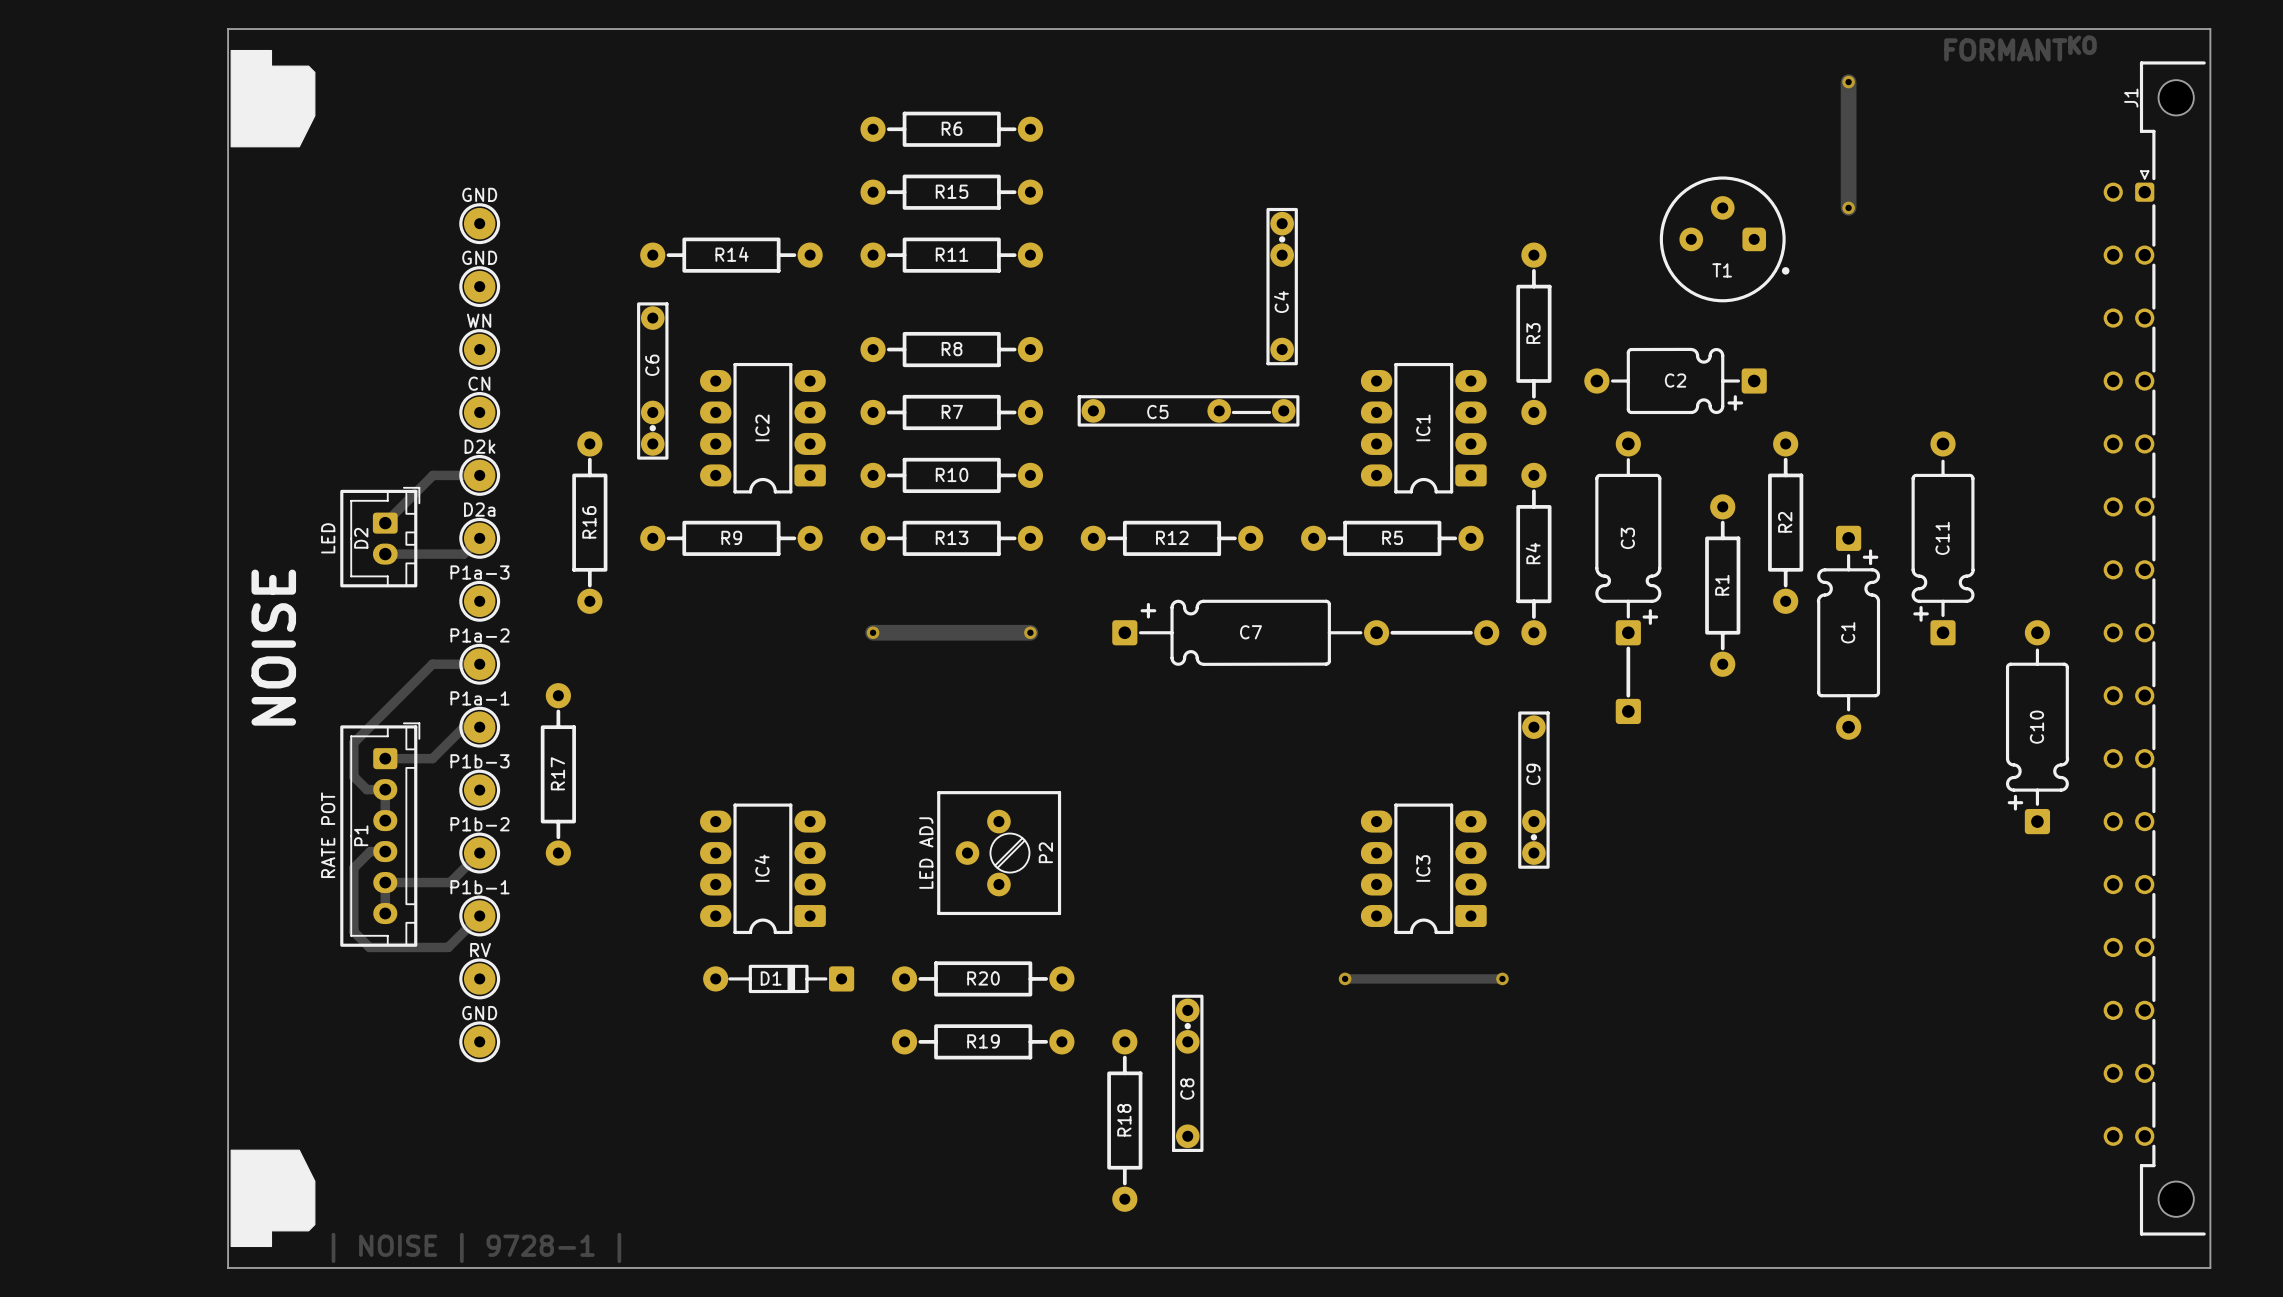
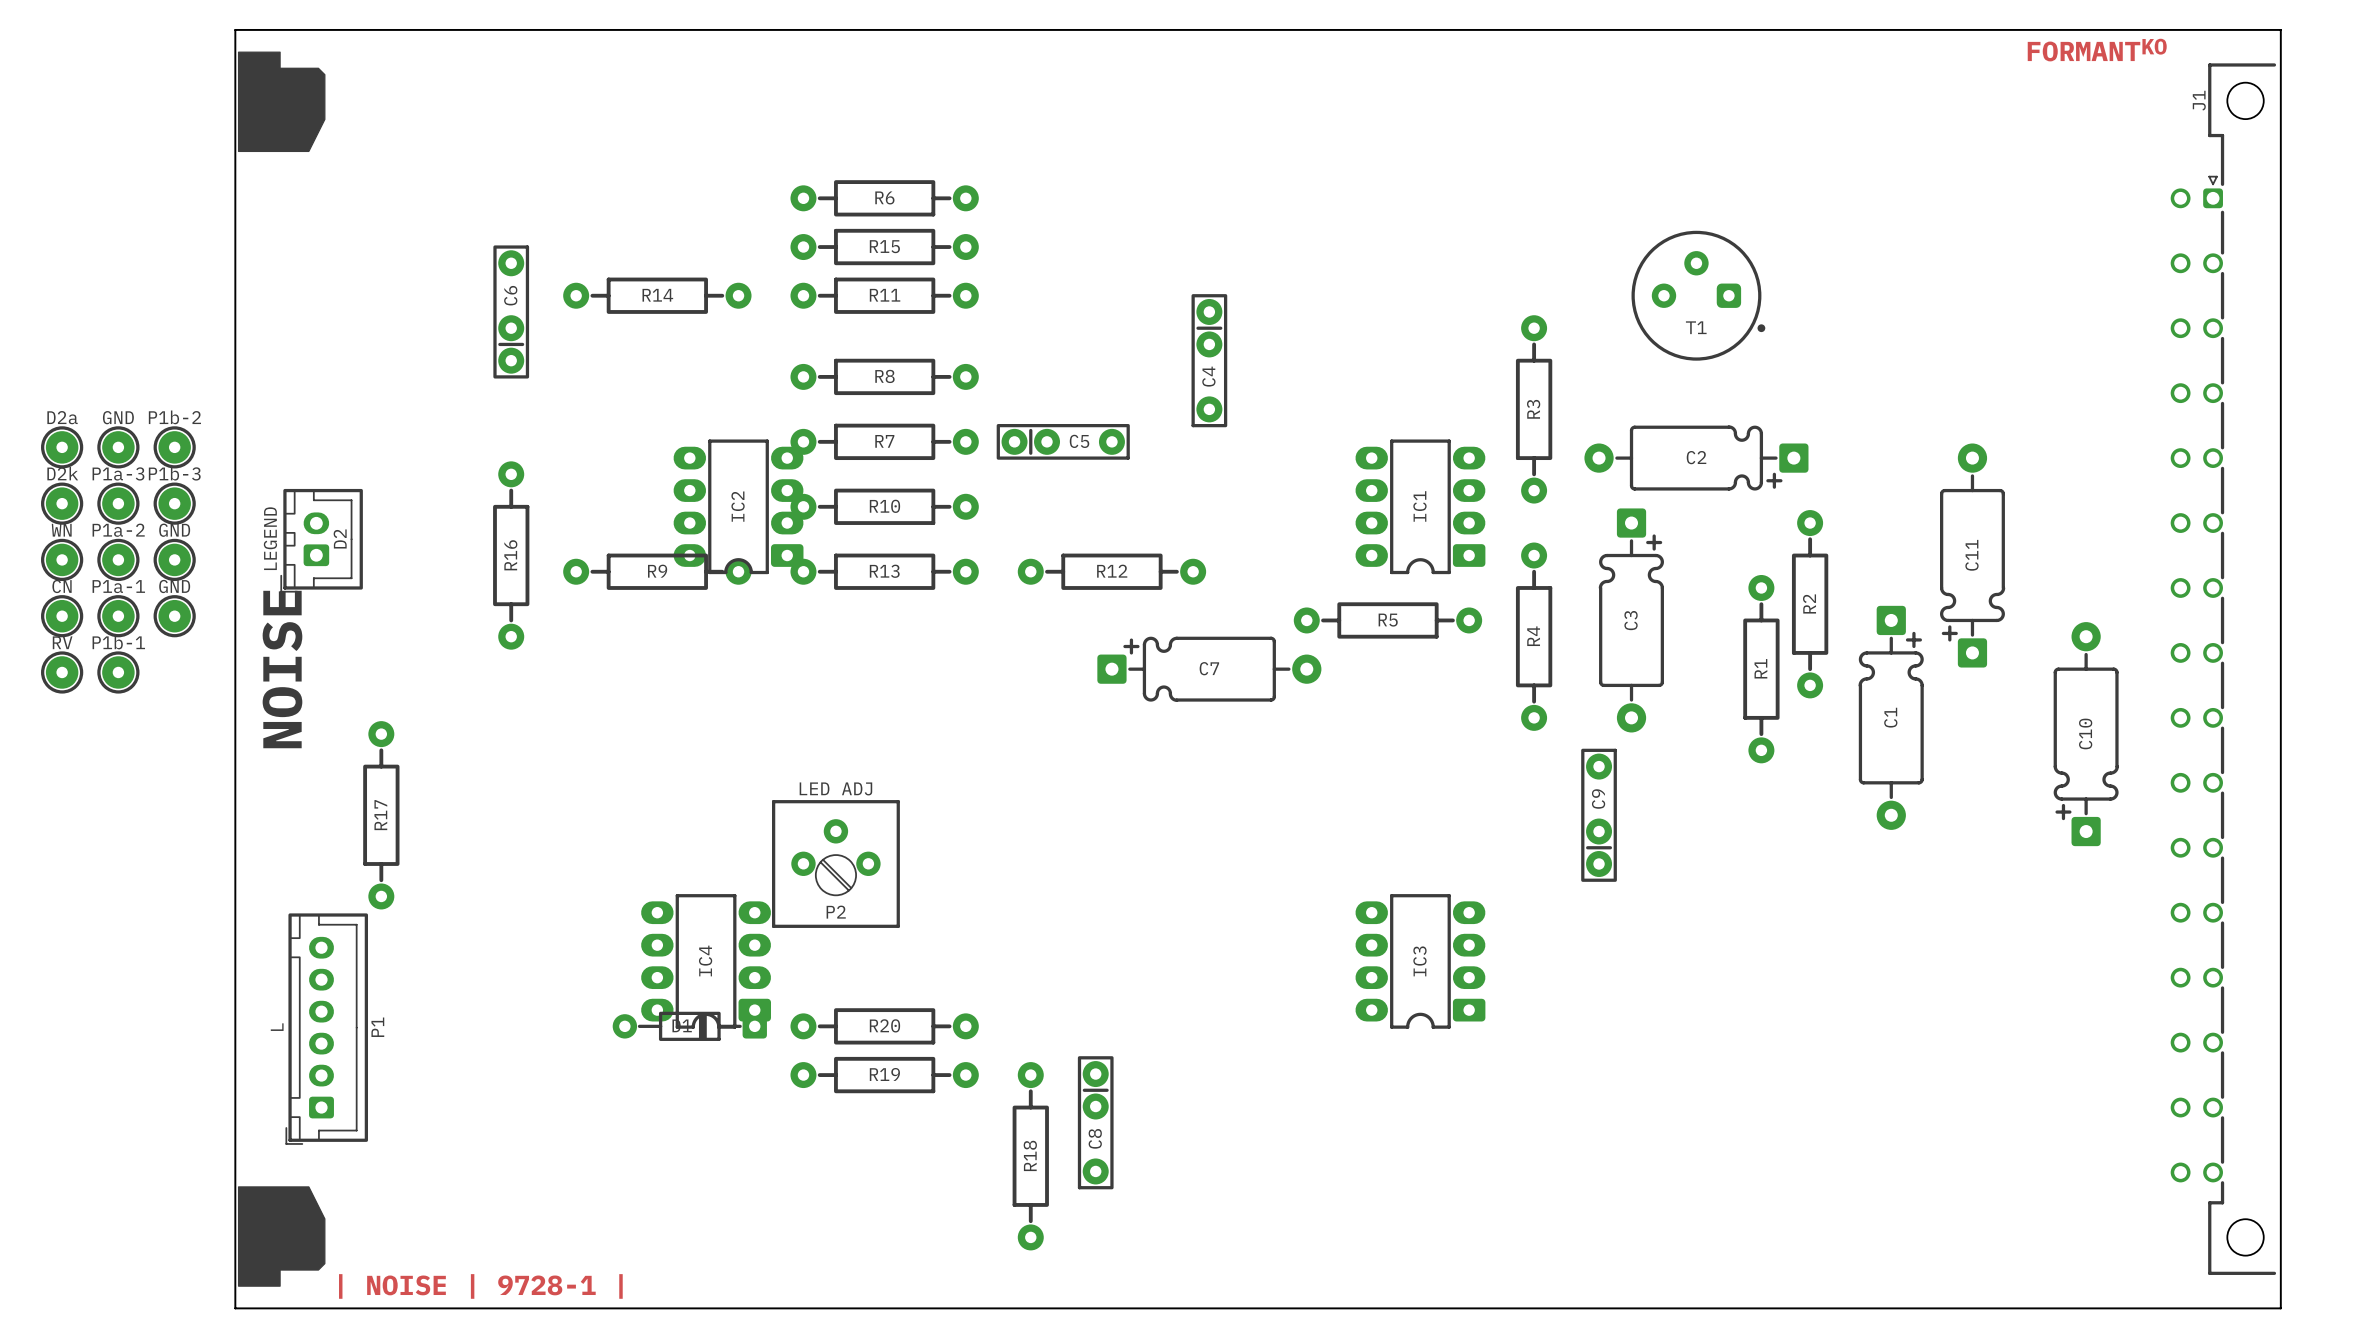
track: (1848, 82) (1848, 207) -> none
via: (1848, 82) -> none
R6 position: (951, 129) -> (884, 198)
R15 position: (951, 192) -> (884, 247)
C4 footprint: [1266, 207, 1298, 366] -> [1191, 294, 1228, 428]
via: (1848, 207) -> none
part: GND (479, 223) -> none
T1 position: (1724, 239) -> (1698, 295)
R14 position: (731, 255) -> (657, 295)
R11 position: (951, 255) -> (884, 295)
part: GND (479, 286) -> none
C6 footprint: [637, 302, 669, 460] -> [493, 245, 530, 379]
R3 position: (1533, 333) -> (1534, 409)
C2 footprint: [1584, 347, 1767, 415] -> [1584, 425, 1809, 491]
part: WN (479, 349) -> none
R8 position: (951, 349) -> (884, 376)
C5 footprint: [1077, 395, 1300, 427] -> [996, 424, 1130, 460]
part: CN (479, 412) -> none
R7 position: (951, 412) -> (884, 441)
C5 name position: C5 (1157, 412) -> C5 (1079, 441)
IC2 position: (762, 428) -> (738, 506)
IC1 position: (1423, 428) -> (1420, 506)
C3 footprint: [1595, 431, 1662, 725] -> [1598, 508, 1664, 733]
C11 footprint: [1911, 431, 1975, 646] -> [1940, 443, 2006, 668]
part: none -> D2a (62, 447)
part: none -> GND (118, 447)
part: none -> P1b-2 (174, 447)
track: (479, 475) (432, 475) (385, 523) -> none
part: D2k (479, 475) -> none
R10 position: (951, 475) -> (884, 506)
part: none -> D2k (62, 503)
part: none -> P1a-3 (118, 503)
part: none -> P1b-3 (174, 503)
R16 position: (589, 522) -> (511, 555)
R2 position: (1785, 522) -> (1810, 604)
C1 footprint: [1816, 525, 1881, 740] -> [1858, 605, 1924, 830]
D2 rotation: 0° (380, 537) -> 180° (321, 540)
D2 position: (380, 537) -> (321, 540)
D2 text: LED (328, 538) -> LEGEND (270, 538)
track: (479, 538) (463, 554) (385, 554) -> none
part: D2a (479, 538) -> none
R9 position: (731, 538) -> (657, 571)
R13 position: (951, 538) -> (884, 571)
R12 position: (1172, 538) -> (1111, 571)
R5 position: (1392, 538) -> (1387, 620)
C3 name position: C3 (1627, 538) -> C3 (1631, 620)
part: none -> WN (62, 559)
part: none -> P1a-2 (118, 559)
part: none -> GND (174, 559)
R4 position: (1533, 554) -> (1534, 636)
R1 position: (1722, 585) -> (1761, 669)
part: none -> CN (62, 616)
part: none -> P1a-1 (118, 616)
part: none -> GND (174, 616)
C7 footprint: [1112, 599, 1500, 666] -> [1097, 636, 1322, 702]
part: P1a-3 (479, 601) -> none
C10 footprint: [2005, 620, 2070, 835] -> [2053, 622, 2119, 847]
track: (873, 632) (1030, 632) -> none
via: (873, 632) -> none
via: (1030, 632) -> none
C7 name position: C7 (1250, 632) -> C7 (1209, 668)
part: none -> RV (62, 672)
part: none -> P1b-1 (118, 672)
track: (479, 664) (432, 664) (353, 742) (353, 776) (366, 789) (385, 789) (385, 820) -> none
part: P1a-2 (479, 664) -> none
C9 footprint: [1518, 711, 1550, 869] -> [1581, 748, 1617, 882]
track: (479, 727) (463, 727) (432, 758) (385, 758) -> none
part: P1a-1 (479, 727) -> none
R17 position: (558, 774) -> (381, 815)
part: P1b-3 (479, 790) -> none
P1 rotation: 0° (380, 834) -> 180° (326, 1029)
P1 position: (380, 834) -> (326, 1029)
P1 text: RATE POT (328, 835) -> L (277, 1027)
P1 name position: P1 (361, 835) -> P1 (377, 1027)
track: (385, 851) (370, 851) (353, 868) (353, 931) (369, 947) (448, 947) (479, 915) -> none
track: (479, 853) (450, 882) (385, 882) (385, 913) -> none
part: P1b-2 (479, 853) -> none
P2 rotation: 0° (999, 853) -> 90° clockwise (835, 864)
P2 position: (999, 853) -> (835, 864)
IC4 position: (762, 868) -> (706, 961)
IC3 position: (1423, 868) -> (1420, 961)
part: P1b-1 (479, 915) -> none
D1 footprint: [703, 964, 855, 994] -> [612, 1011, 767, 1041]
part: RV (479, 978) -> none
R20 position: (983, 978) -> (884, 1026)
track: (1345, 978) (1502, 978) -> none
via: (1345, 978) -> none
via: (1502, 978) -> none
C8 footprint: [1172, 994, 1204, 1153] -> [1077, 1056, 1114, 1190]
part: GND (479, 1041) -> none
R19 position: (983, 1041) -> (884, 1075)
R18 position: (1124, 1120) -> (1030, 1156)

